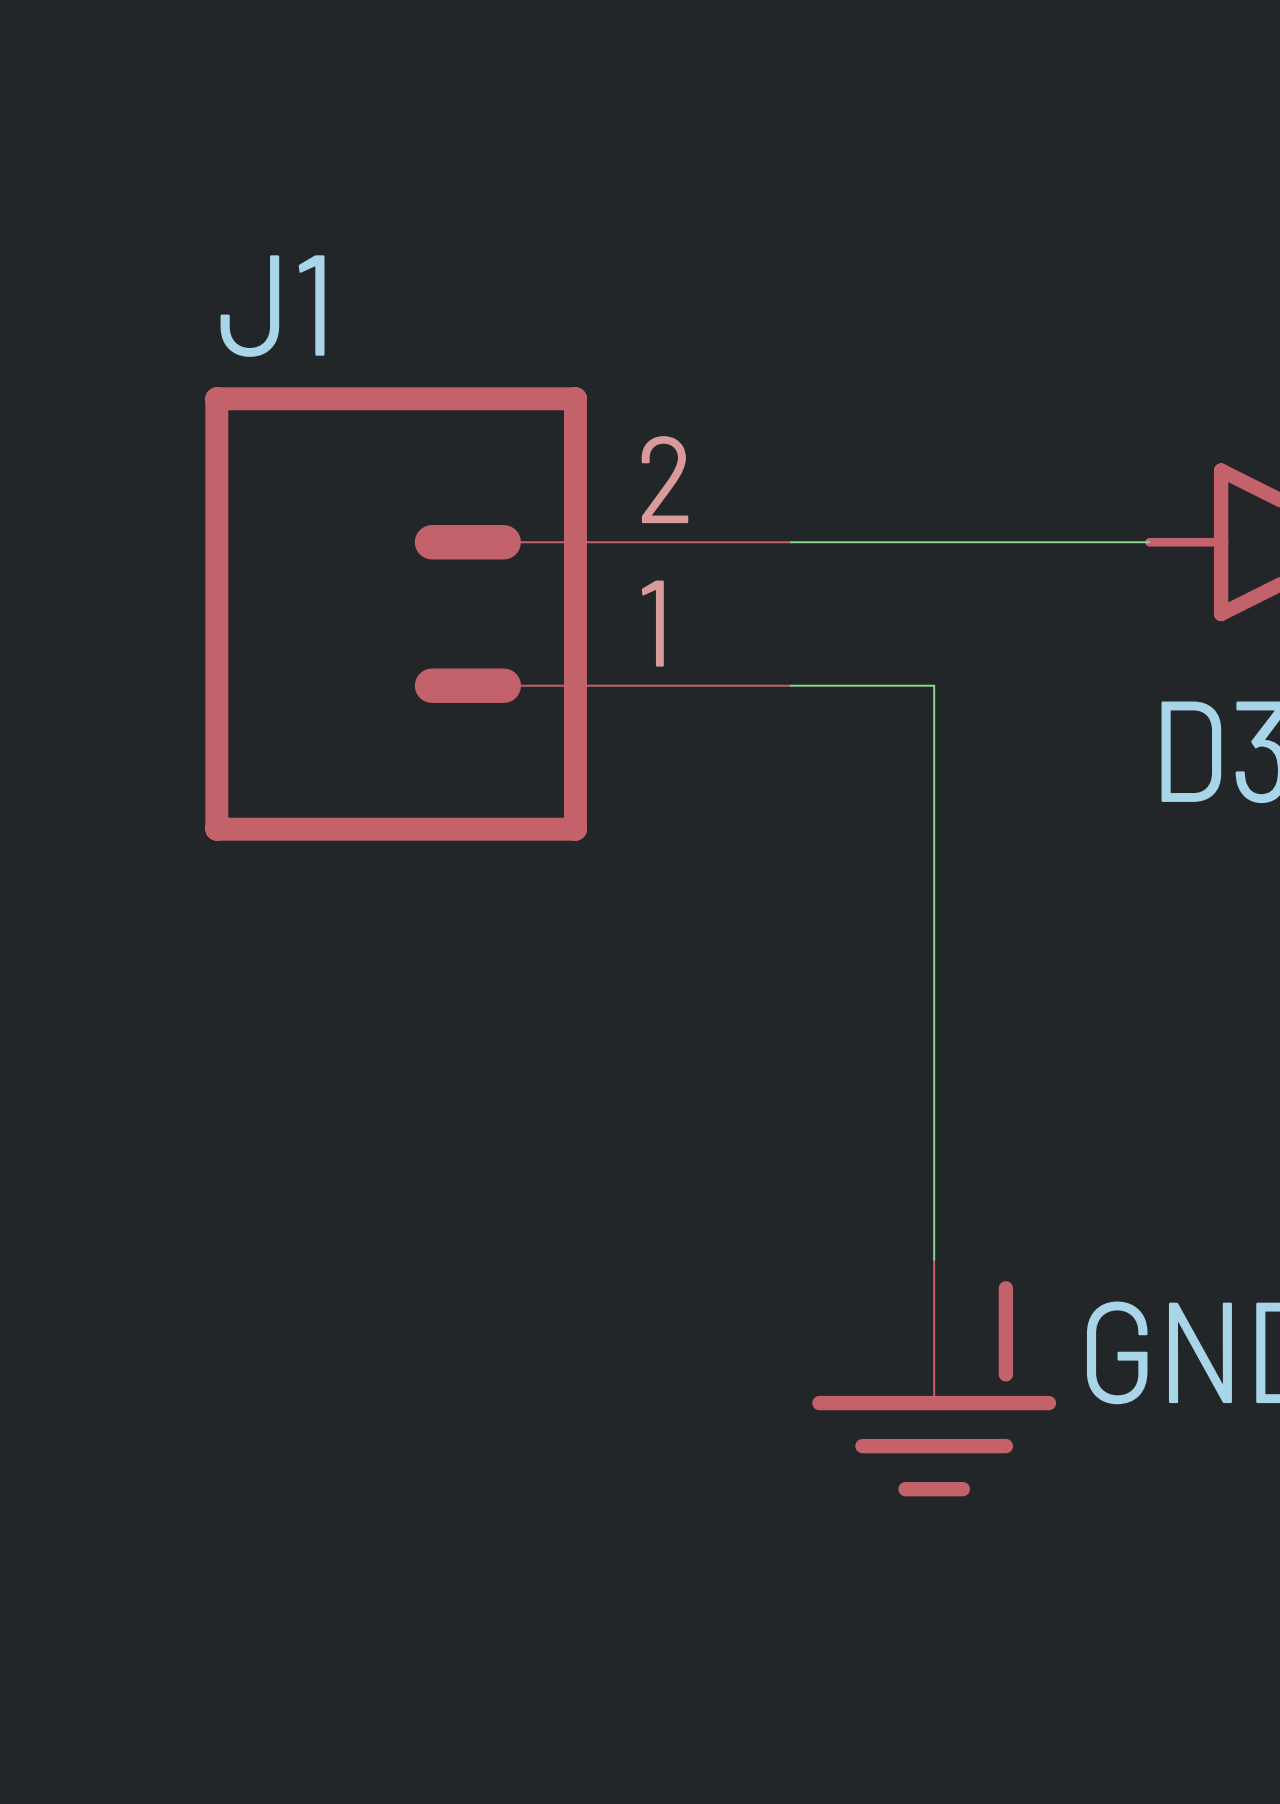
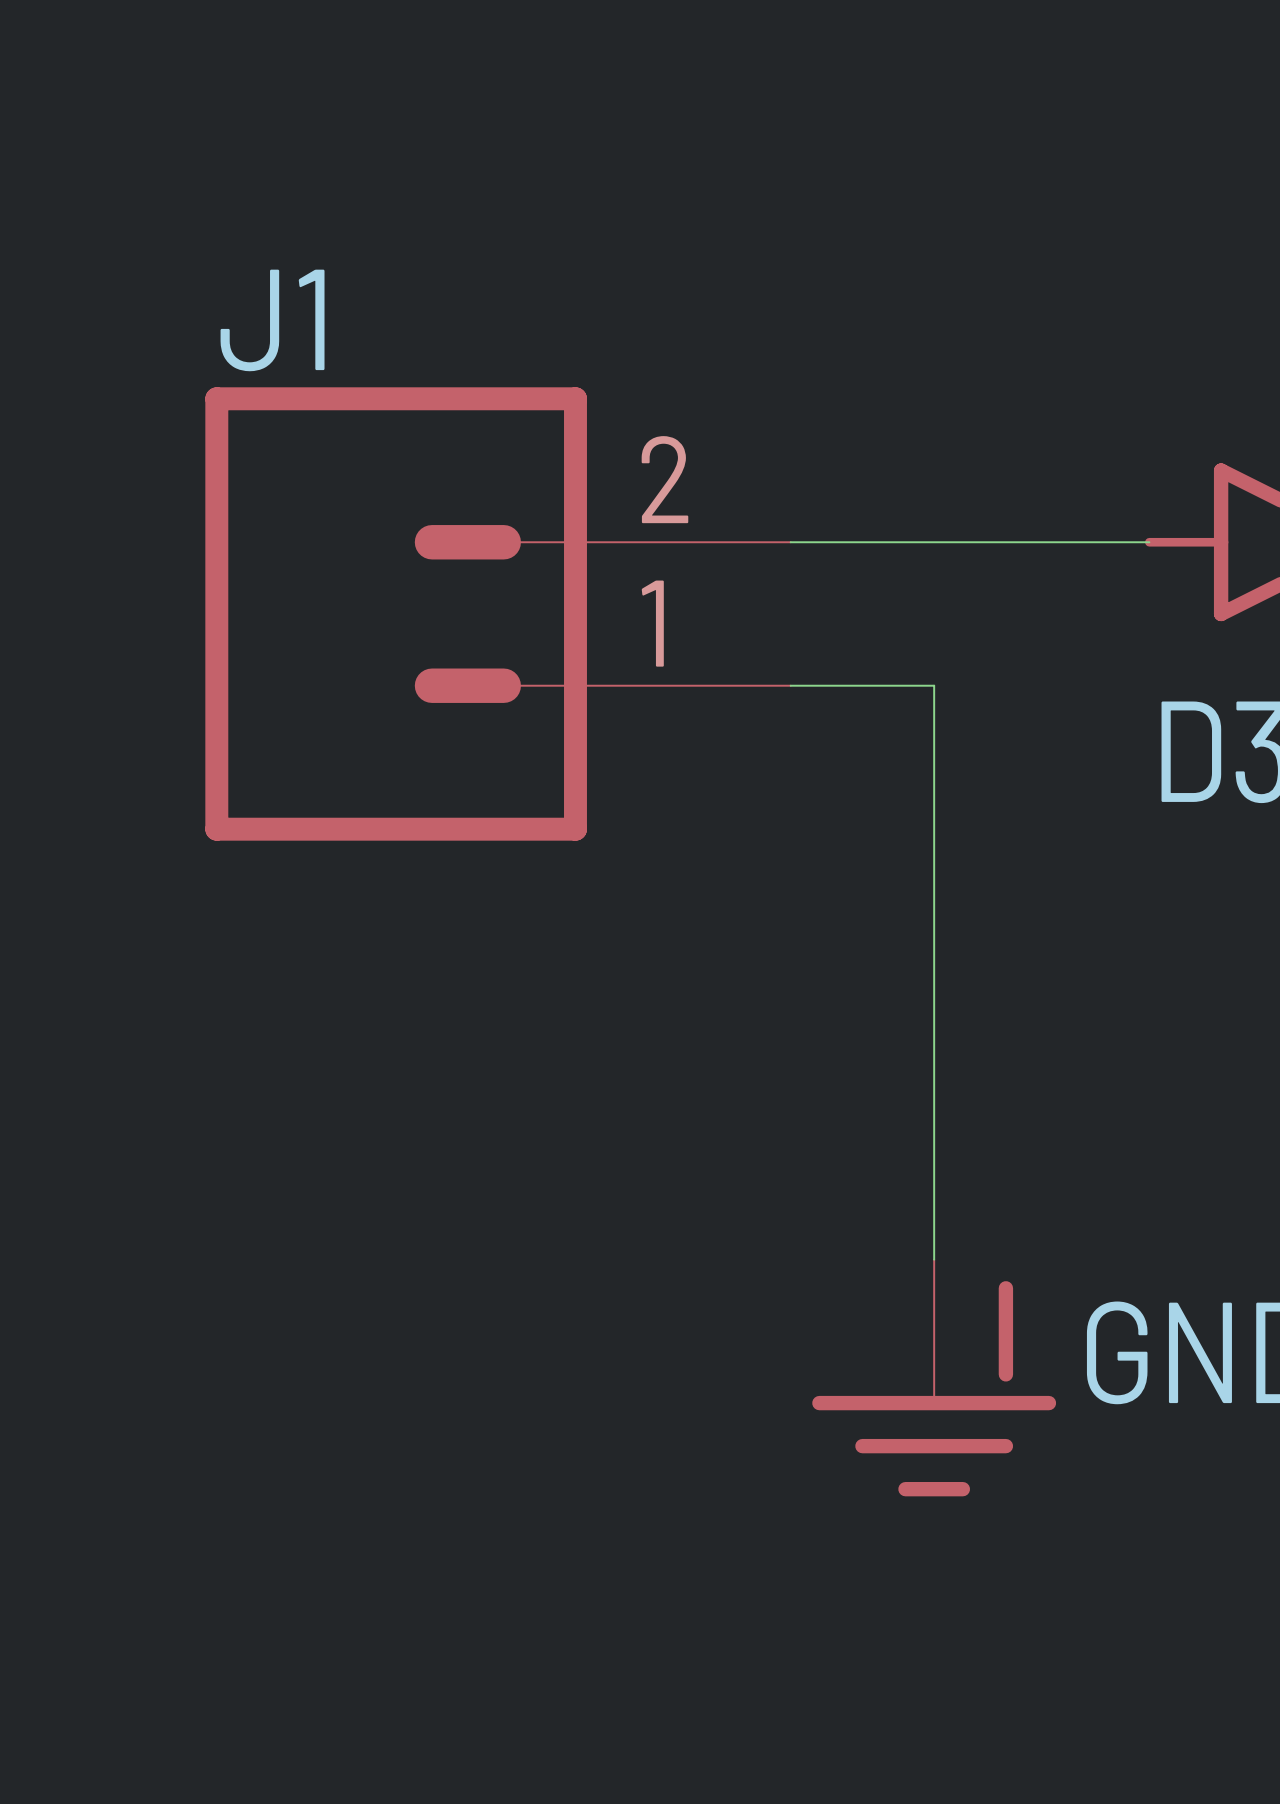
J1 name position: J1 (272, 306) -> J1 (272, 320)

